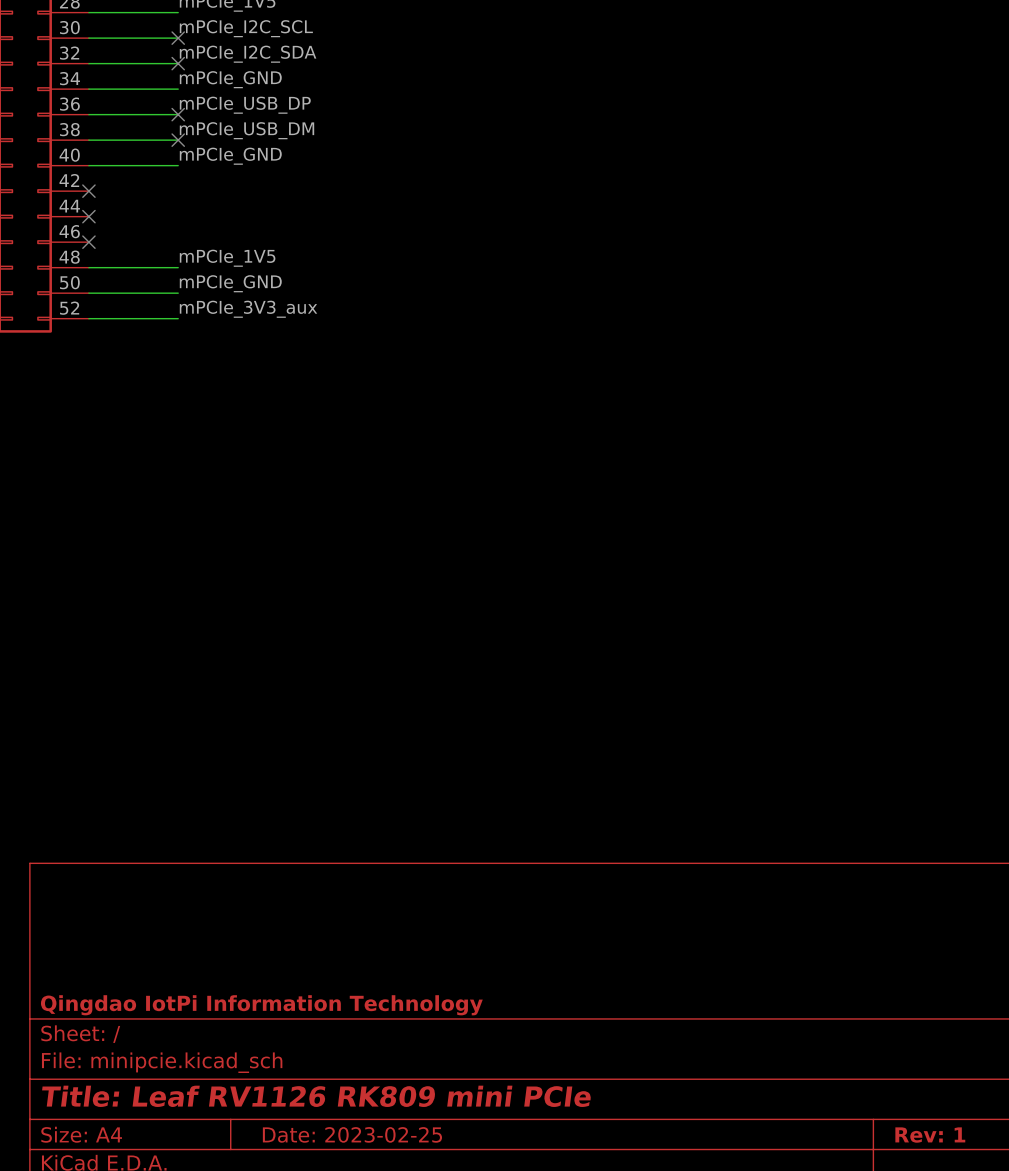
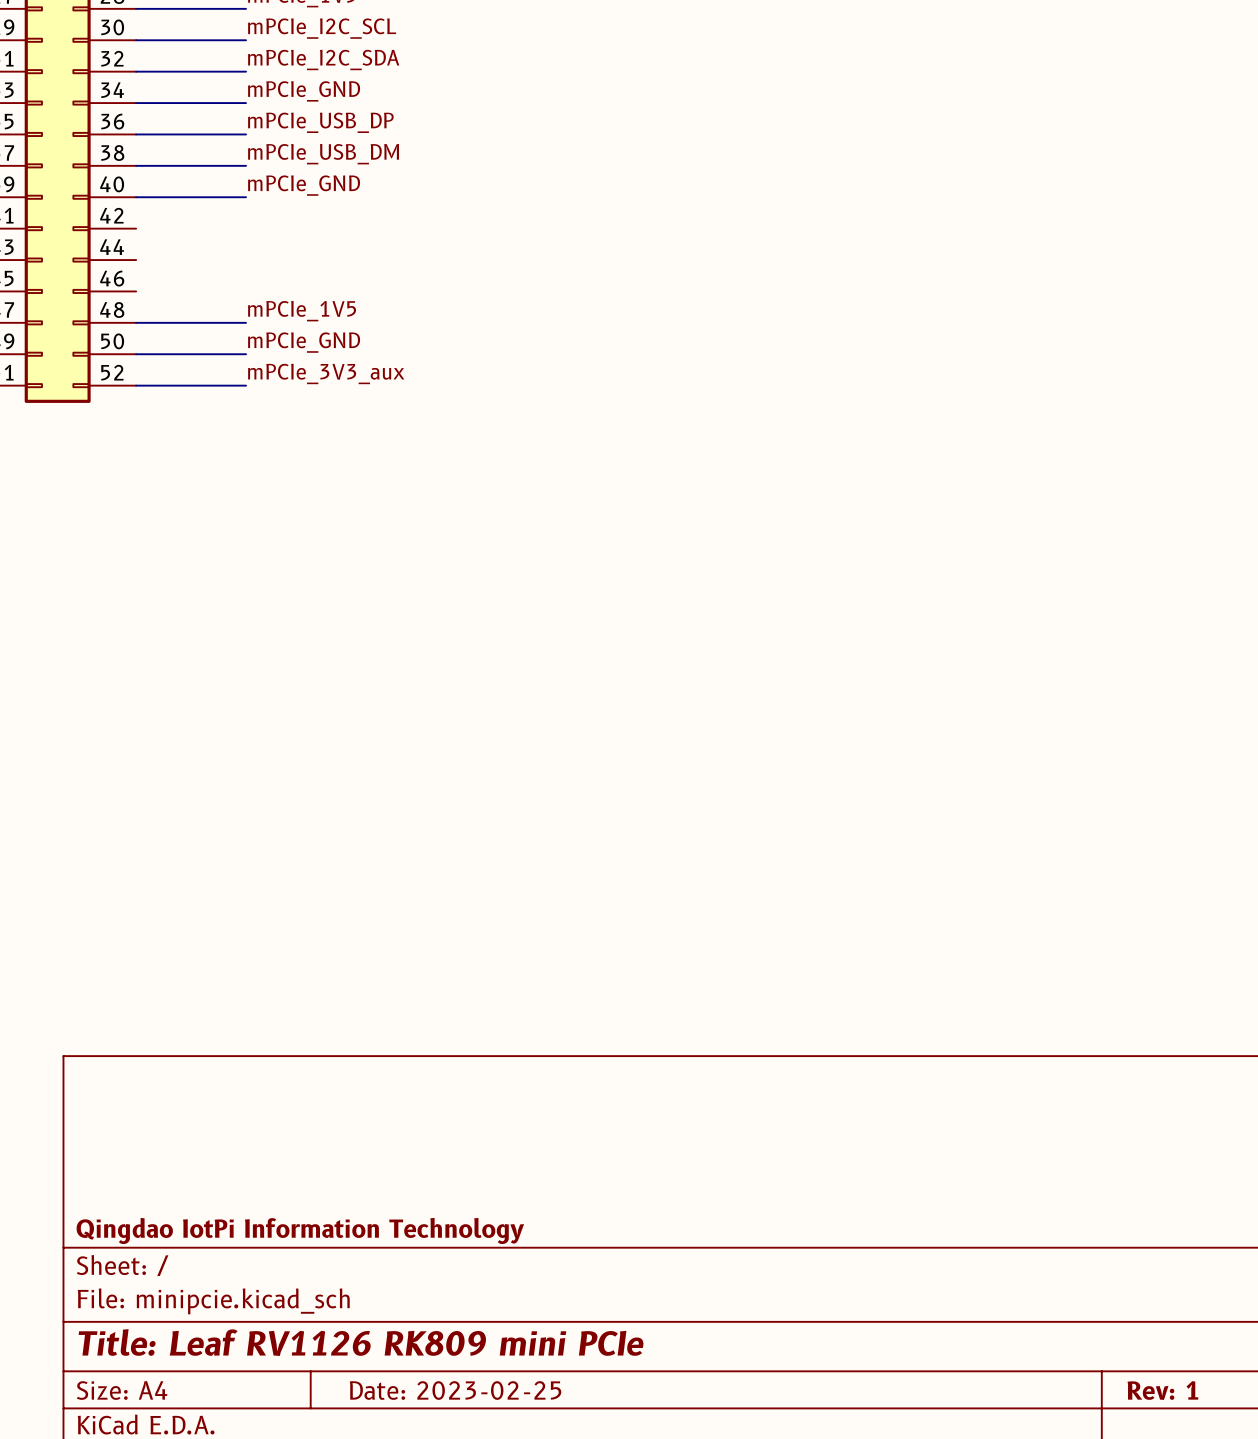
no-connect mark: (178, 38) -> none
no-connect mark: (178, 63) -> none
no-connect mark: (178, 114) -> none
no-connect mark: (178, 140) -> none
no-connect mark: (88, 191) -> none
no-connect mark: (88, 216) -> none
no-connect mark: (88, 242) -> none

